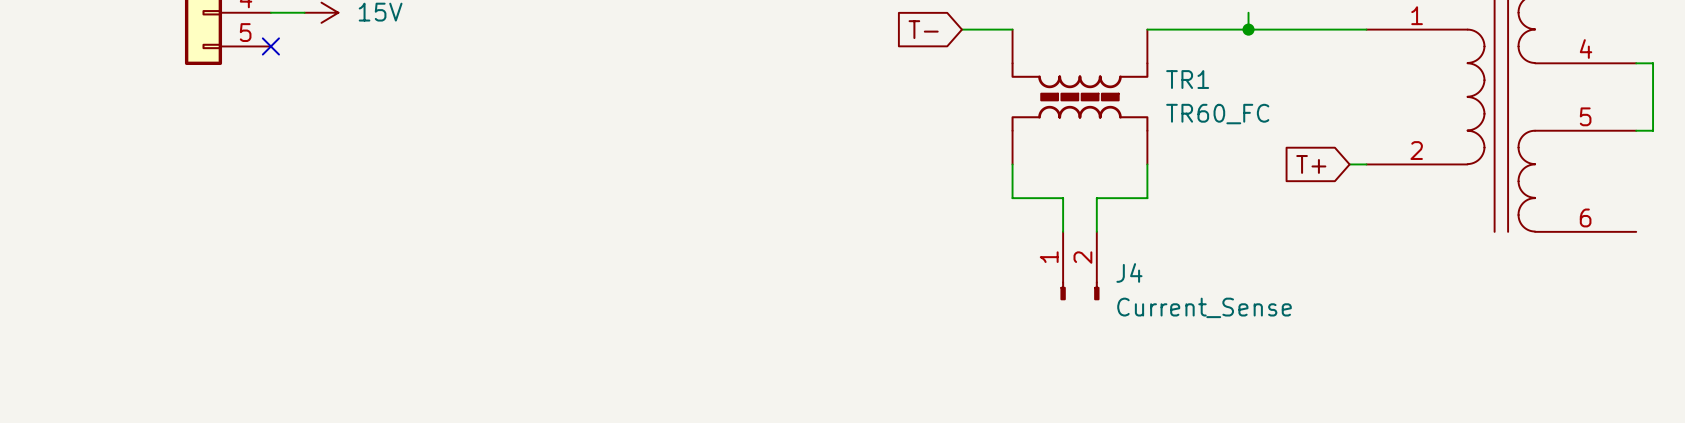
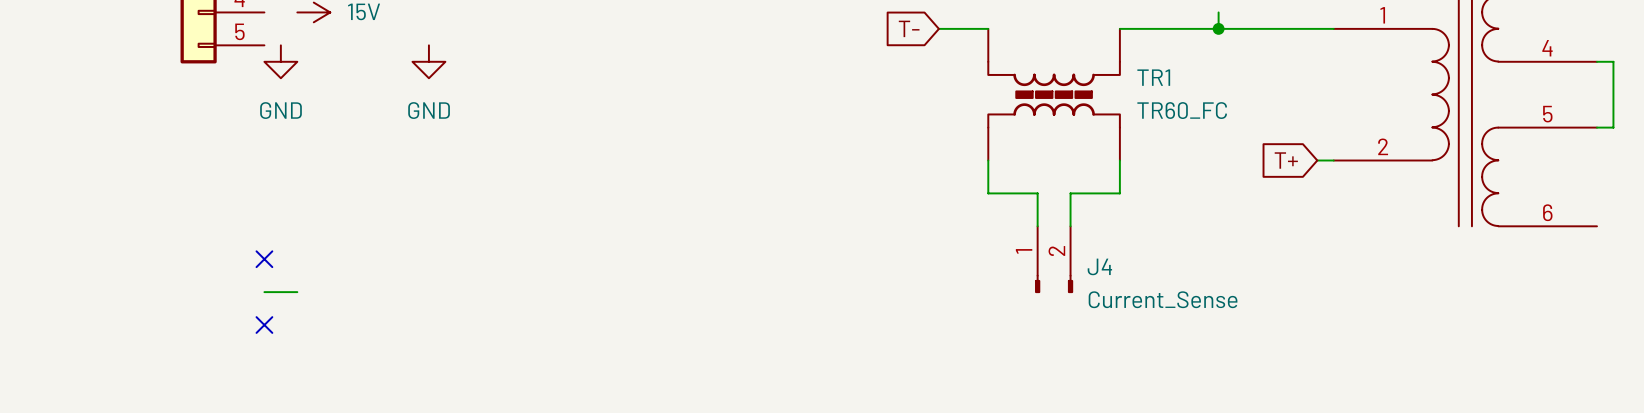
wire: (270, 12) (304, 12) -> (264, 292) (297, 292)
no-connect mark: (270, 46) -> none
power symbol: none -> GND (280, 61)
power symbol: none -> GND (428, 61)
no-connect mark: none -> (264, 259)
no-connect mark: none -> (264, 325)

